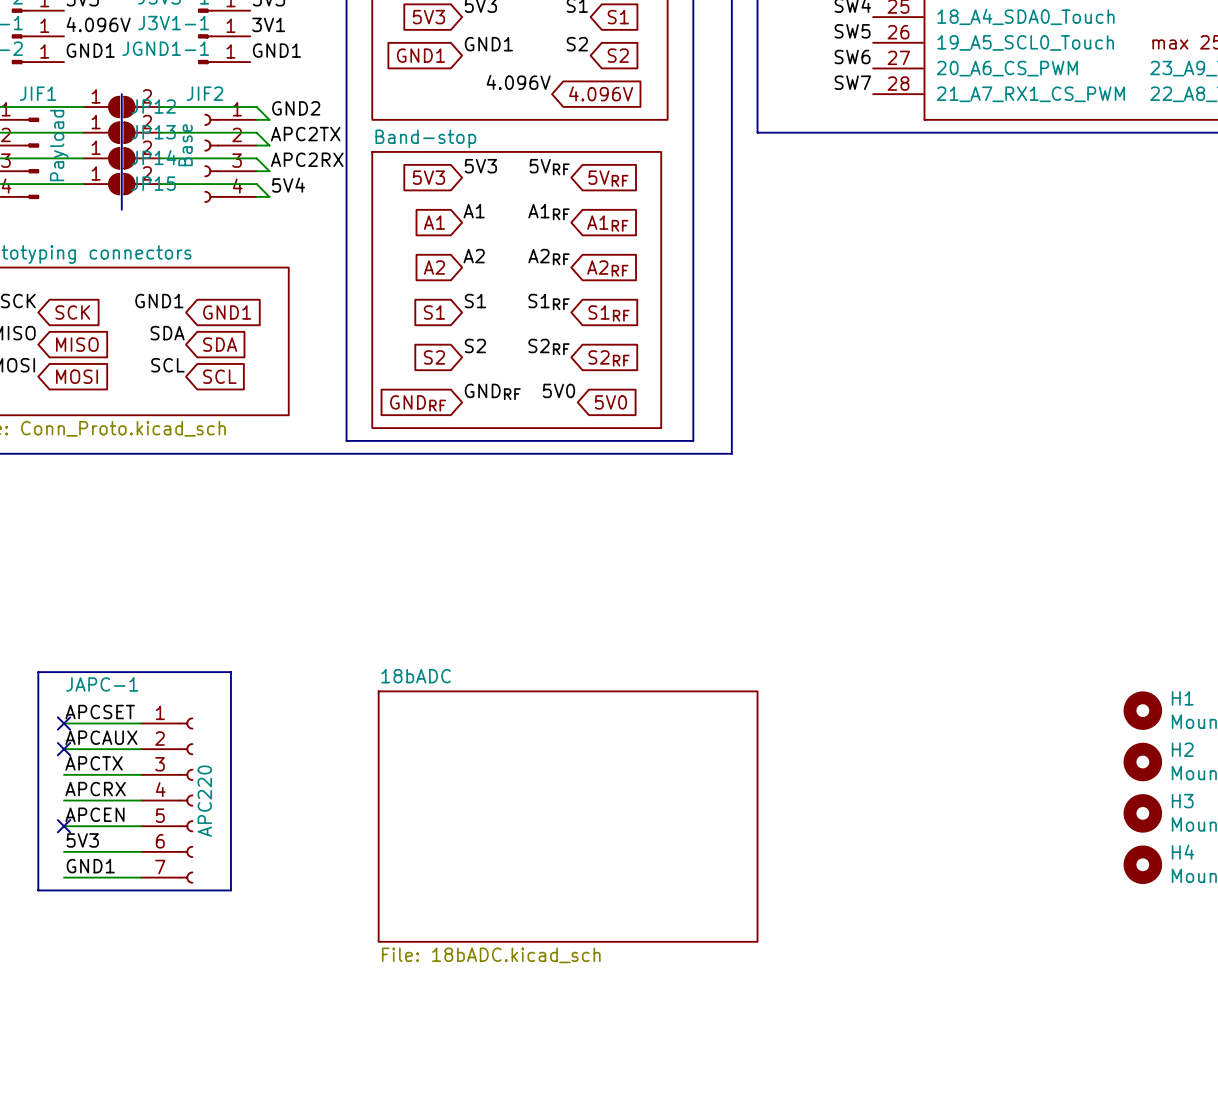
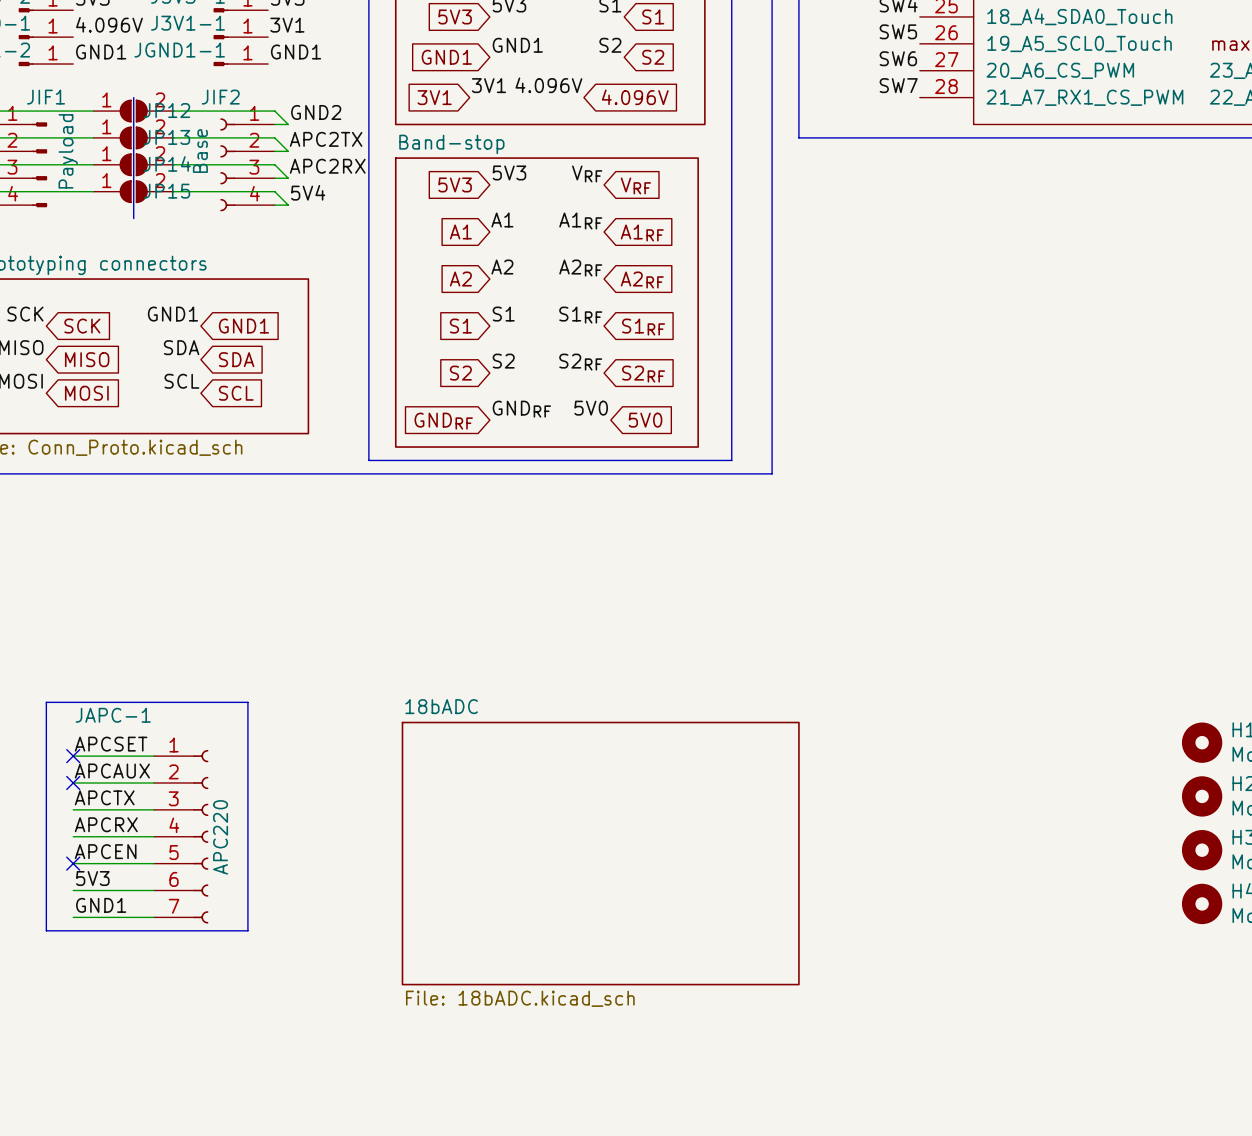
label: none -> 3V1 (488, 85)
global label: none -> 3V1 (434, 97)
label: 5VRF (549, 167) -> VRF (587, 173)
global label: 5VRF (608, 178) -> VRF (635, 185)

